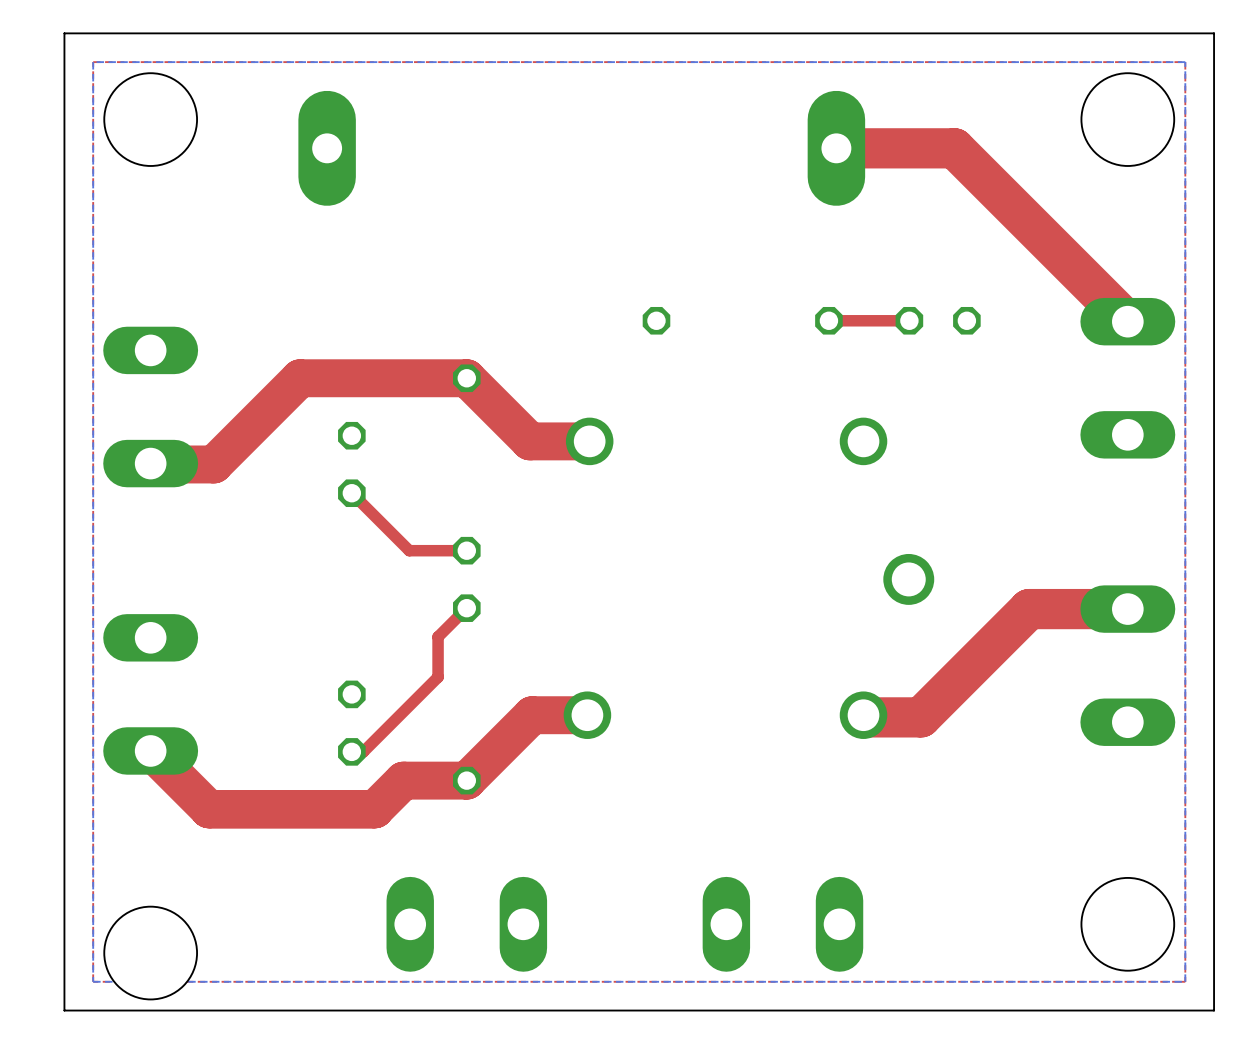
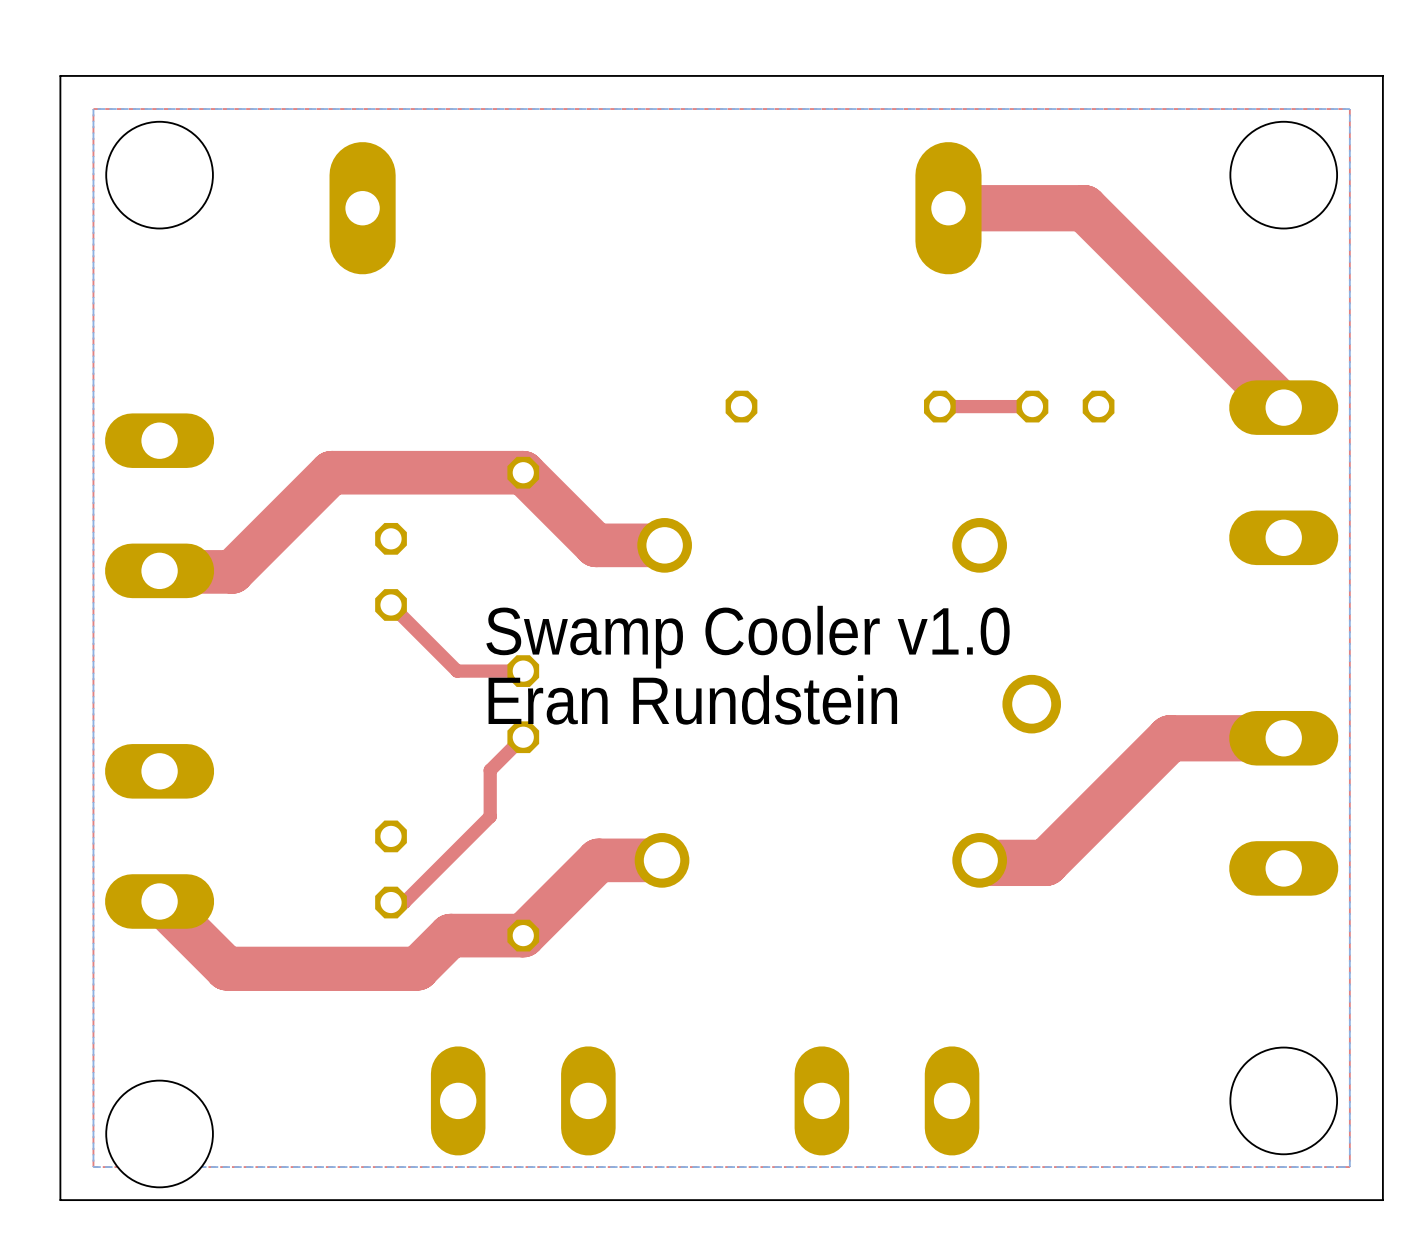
text: none -> Swamp Cooler v1.0 (747, 637)
text: none -> Eran Rundstein (692, 699)

